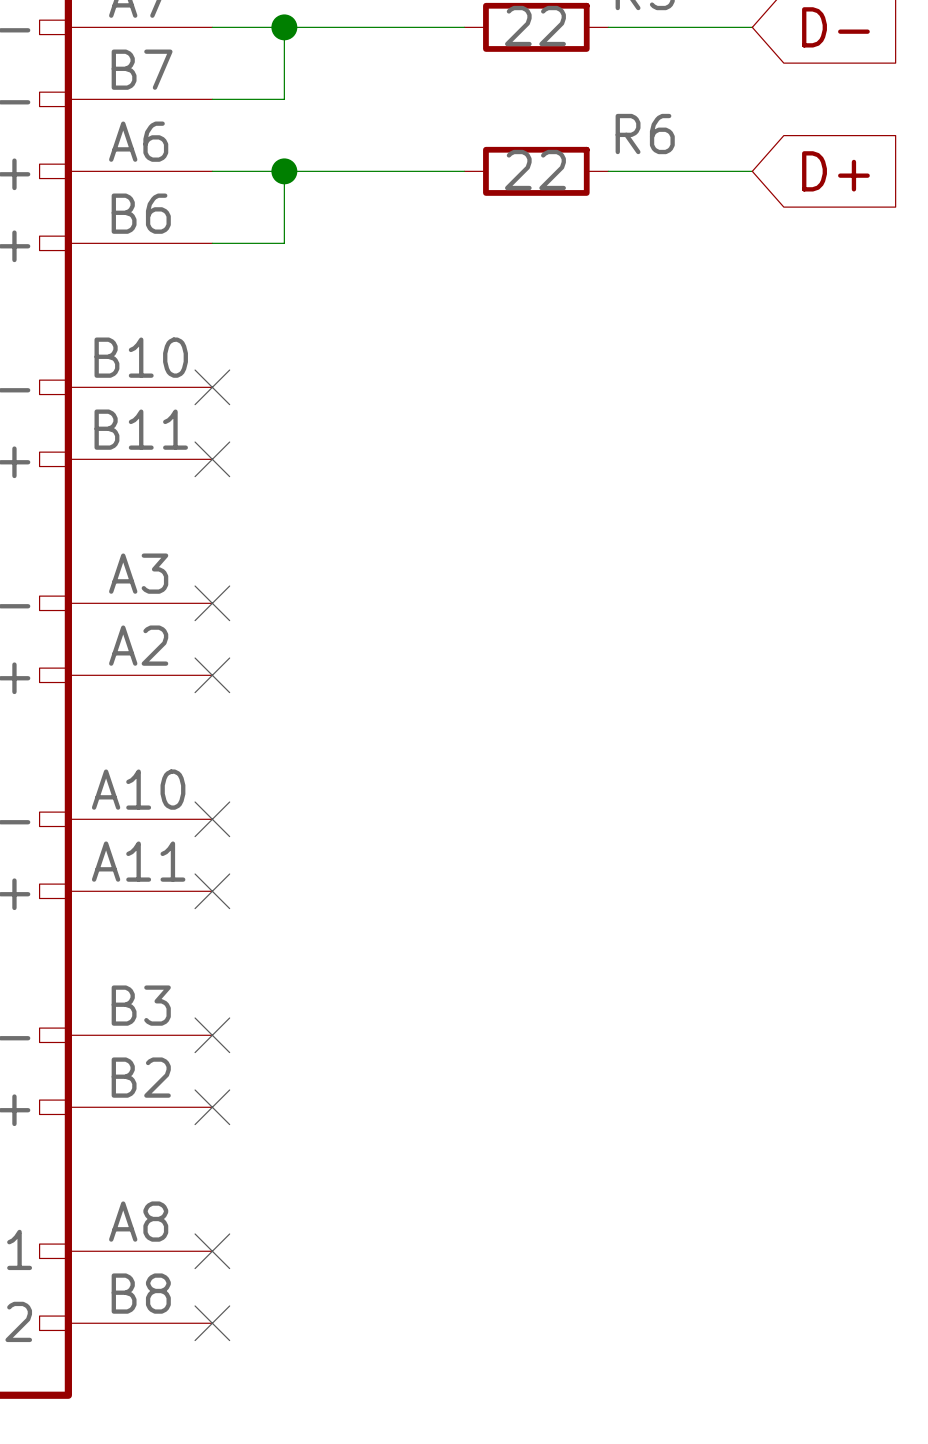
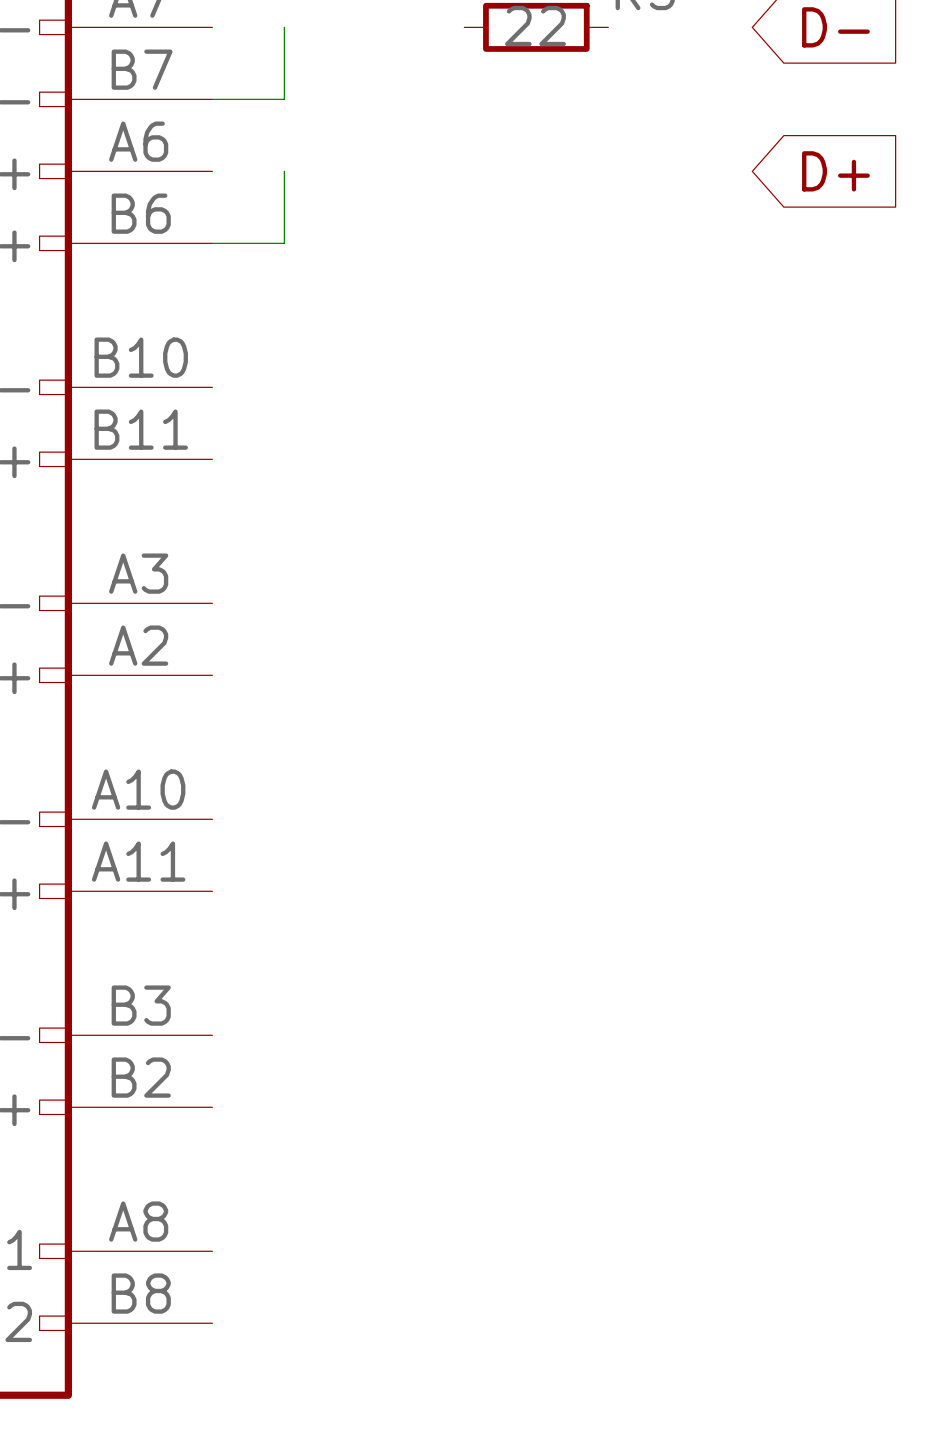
wire: (212, 27) (464, 27) -> none
junction: (284, 27) -> none
wire: (608, 27) (752, 27) -> none
wire: (212, 171) (464, 171) -> none
junction: (284, 171) -> none
R6: 22 (536, 171) -> none
wire: (608, 171) (752, 171) -> none
no-connect mark: (212, 387) -> none
no-connect mark: (212, 459) -> none
no-connect mark: (212, 603) -> none
no-connect mark: (212, 675) -> none
no-connect mark: (212, 819) -> none
no-connect mark: (212, 891) -> none
no-connect mark: (212, 1035) -> none
no-connect mark: (212, 1107) -> none
no-connect mark: (212, 1251) -> none
no-connect mark: (212, 1323) -> none

